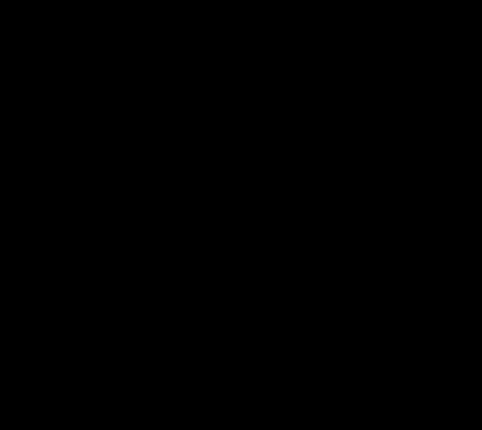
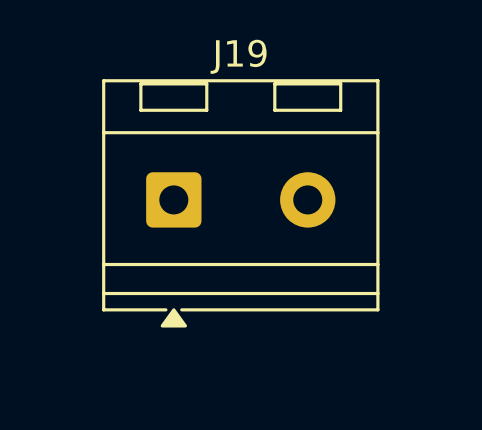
J19: none -> (240, 203)

